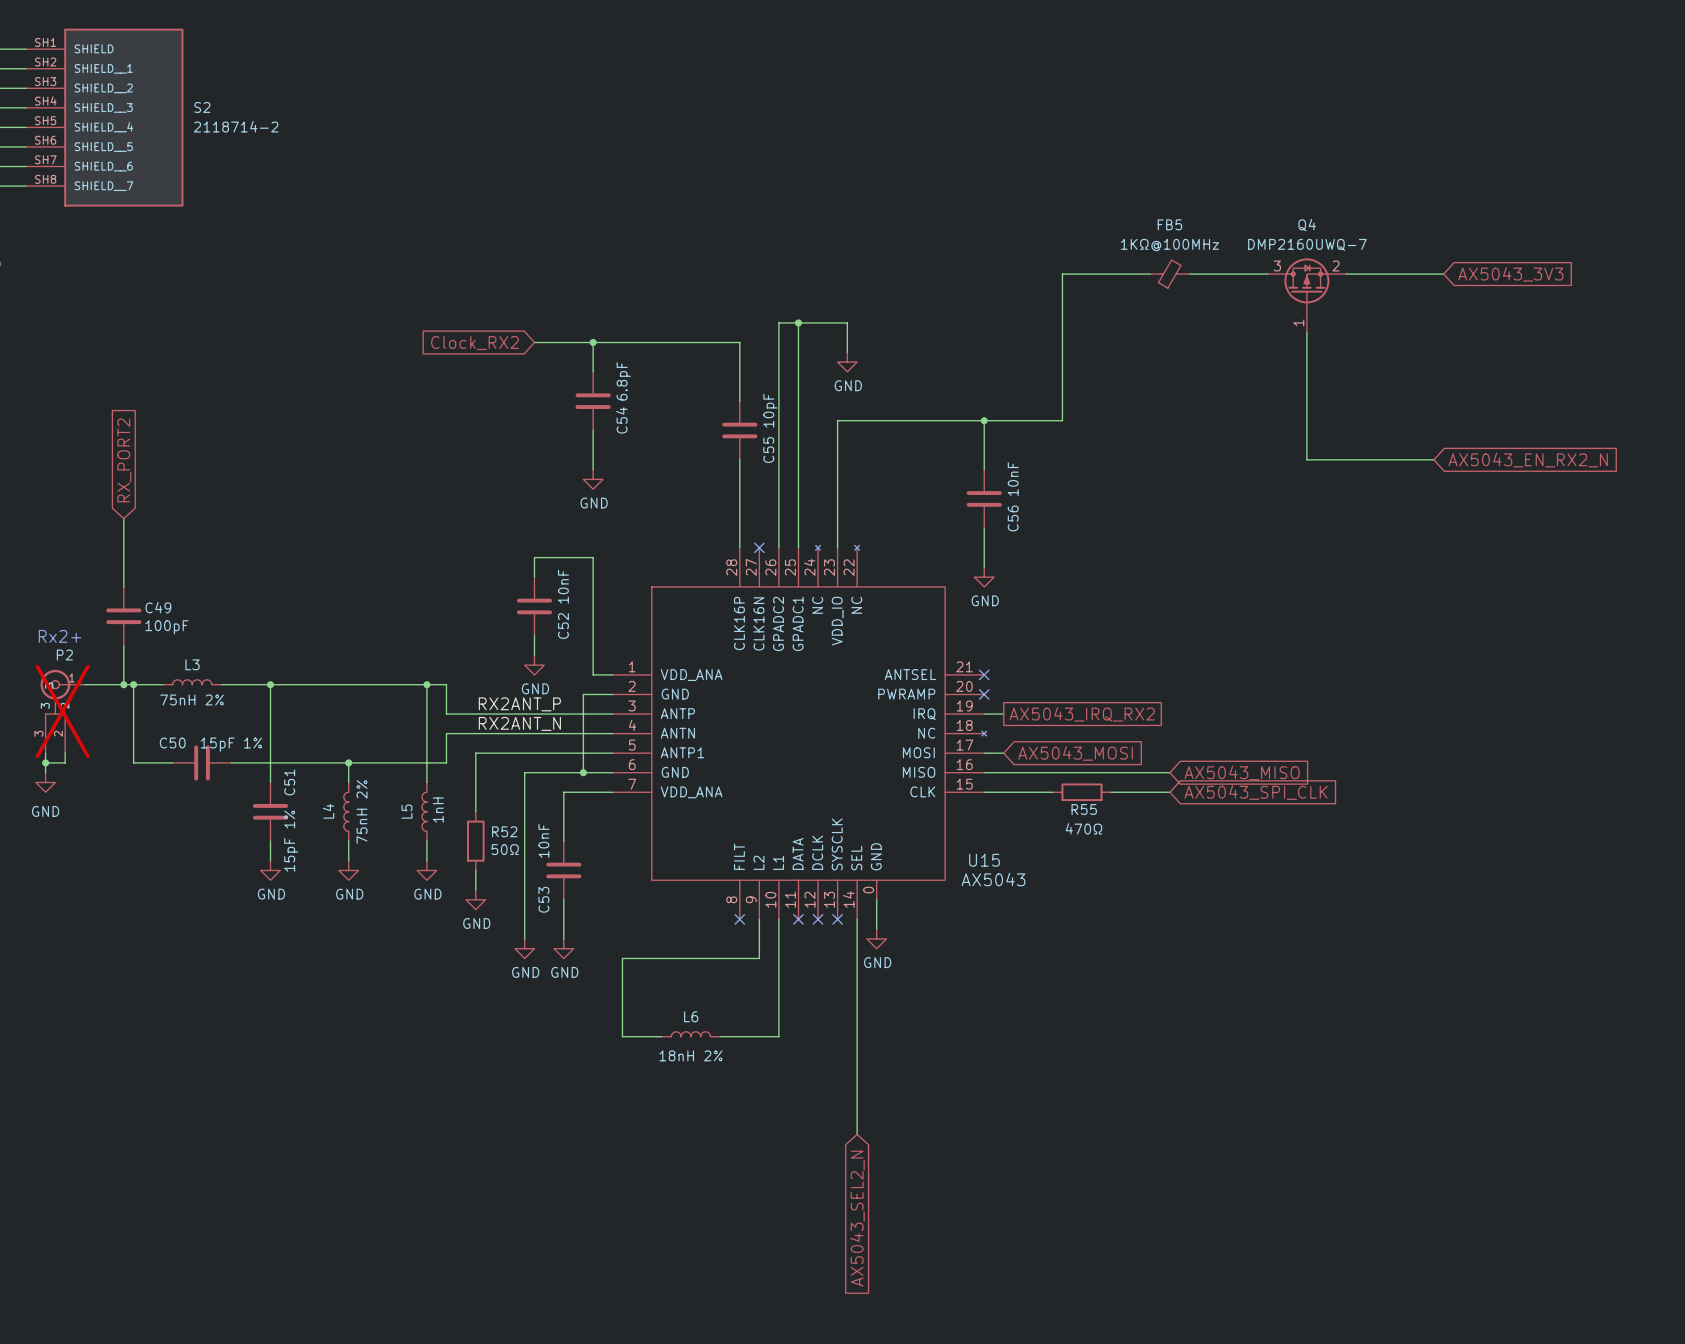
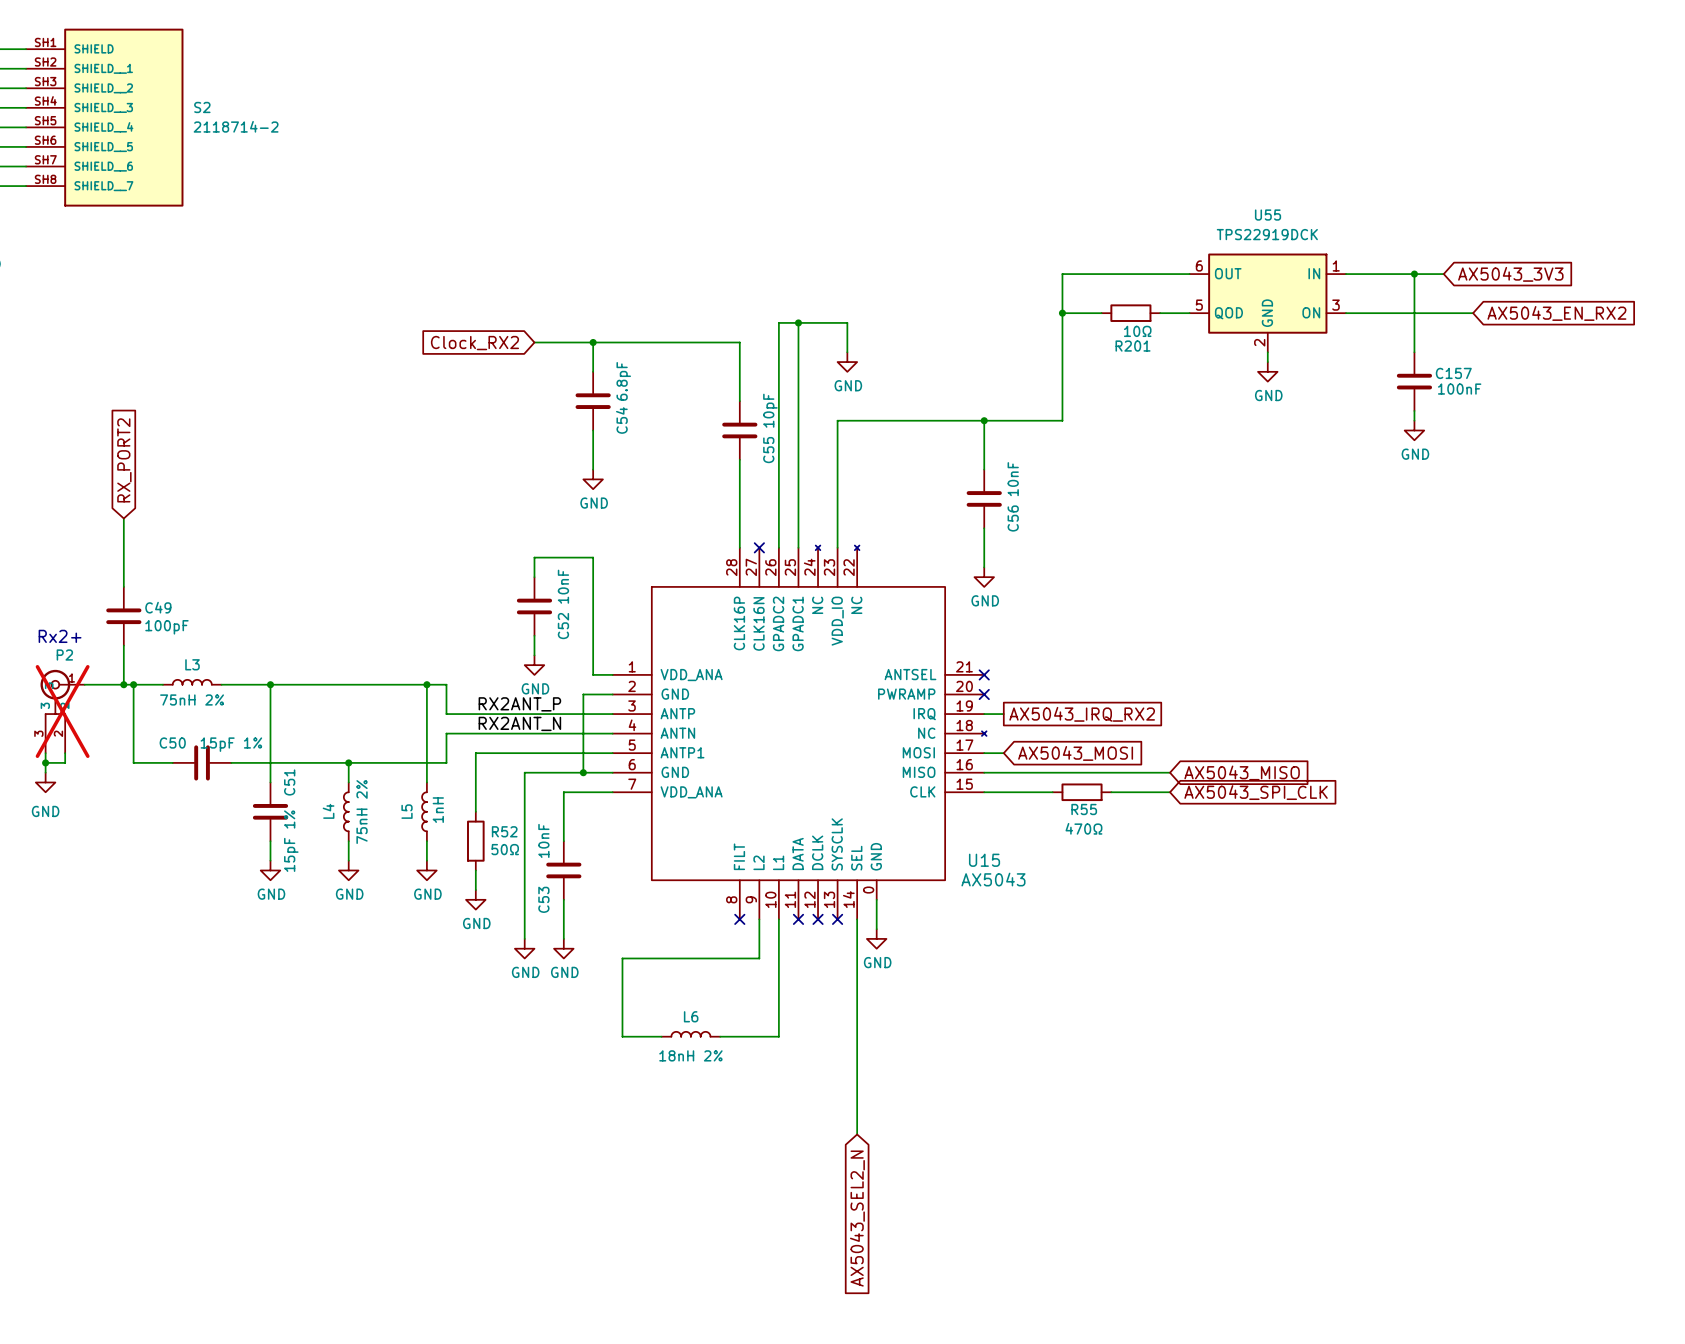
FB5: 1KΩ@100MHz (1170, 274) -> none
wire: none -> (1414, 274) (1414, 352)
junction: none -> (1414, 274)
Q4: DMP2160UWQ-7 (1306, 295) -> none
U55: none -> TPS22919DCK (1267, 302)
wire: none -> (1062, 313) (1101, 313)
junction: none -> (1062, 313)
R201: none -> 10Ω (1130, 313)
wire: none -> (1160, 313) (1189, 313)
wire: none -> (1346, 313) (1473, 313)
global label: none -> AX5043_EN_RX2 (1556, 313)
wire: (1306, 332) (1306, 459) (1434, 459) -> none
wire: none -> (1267, 352) (1267, 362)
power symbol: none -> GND (1267, 371)
C157: none -> 100nF (1414, 381)
wire: none -> (1414, 410) (1414, 420)
power symbol: none -> GND (1414, 430)
global label: AX5043_EN_RX2_N (1528, 460) -> none

